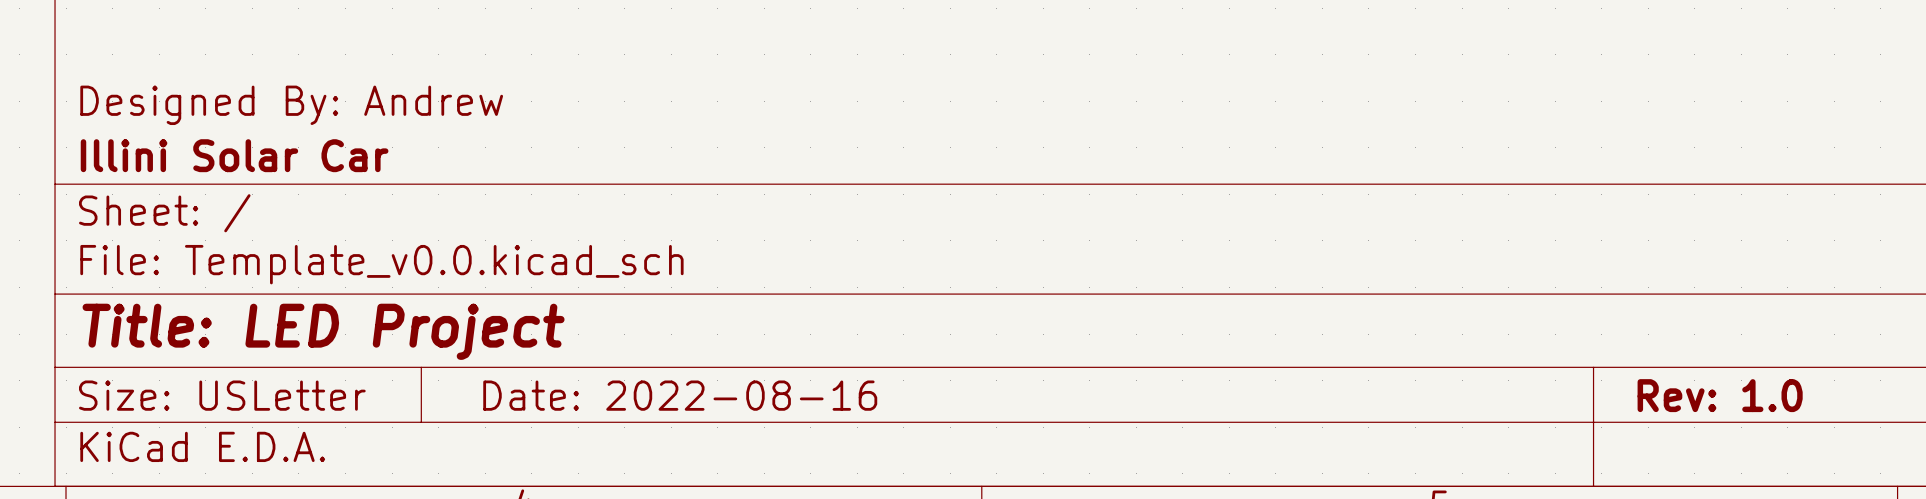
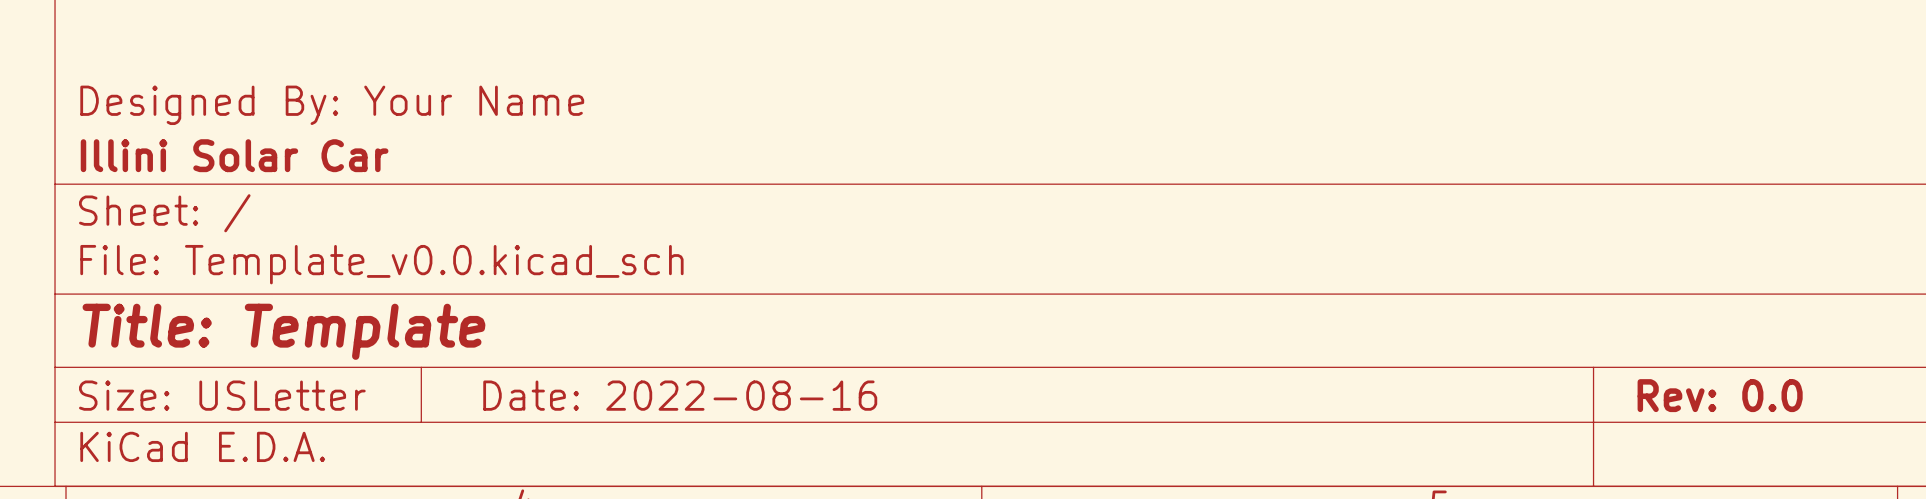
title block: Designed By: Andrew (291, 105) -> Designed By: Your Name (332, 105)
title block: Title: LED Project (323, 331) -> Title: Template (283, 331)
title block: Rev: 1.0 (1720, 395) -> Rev: 0.0 (1720, 395)

